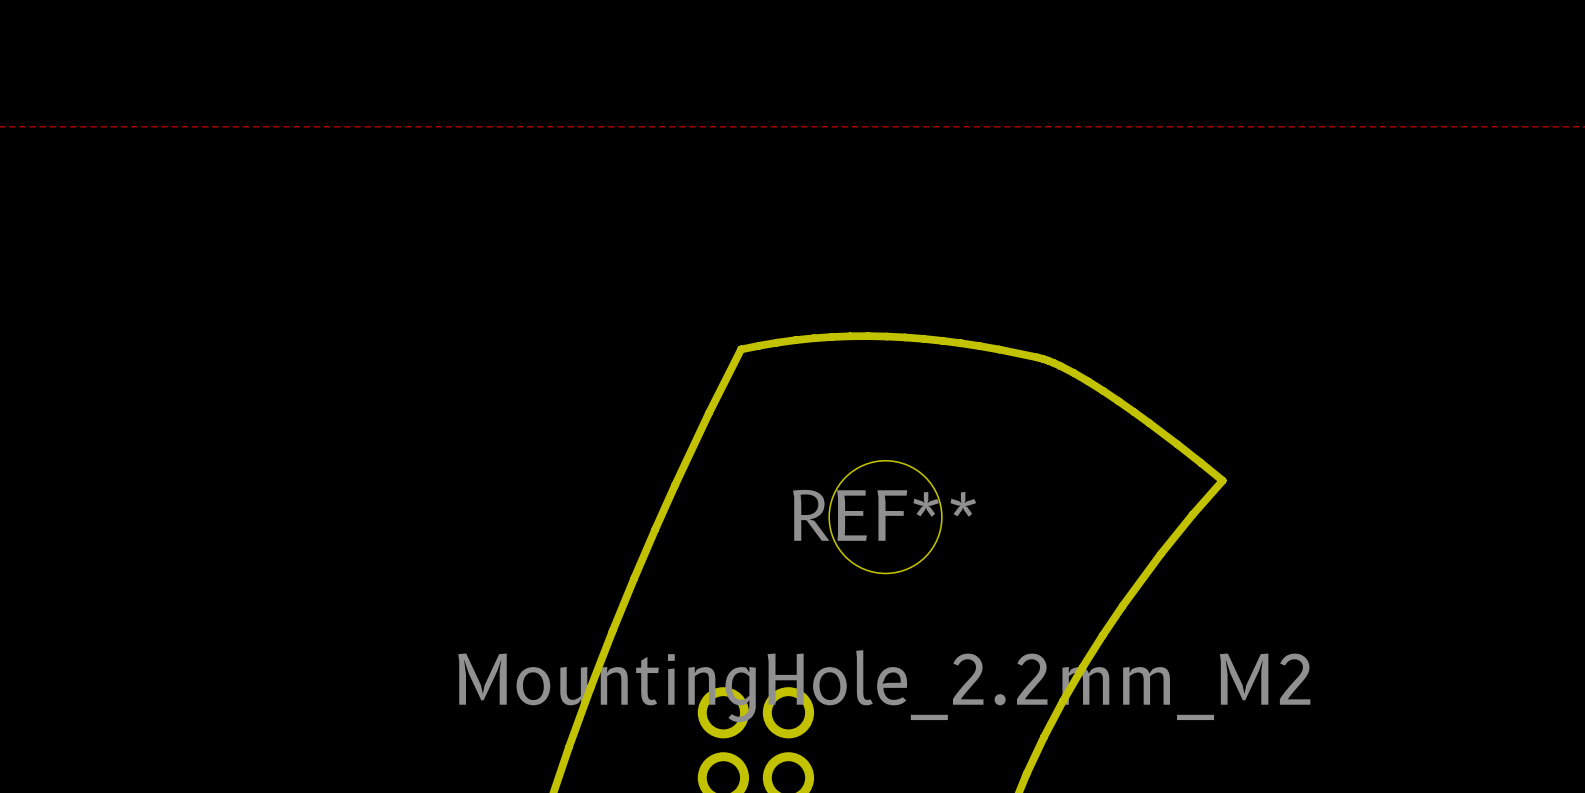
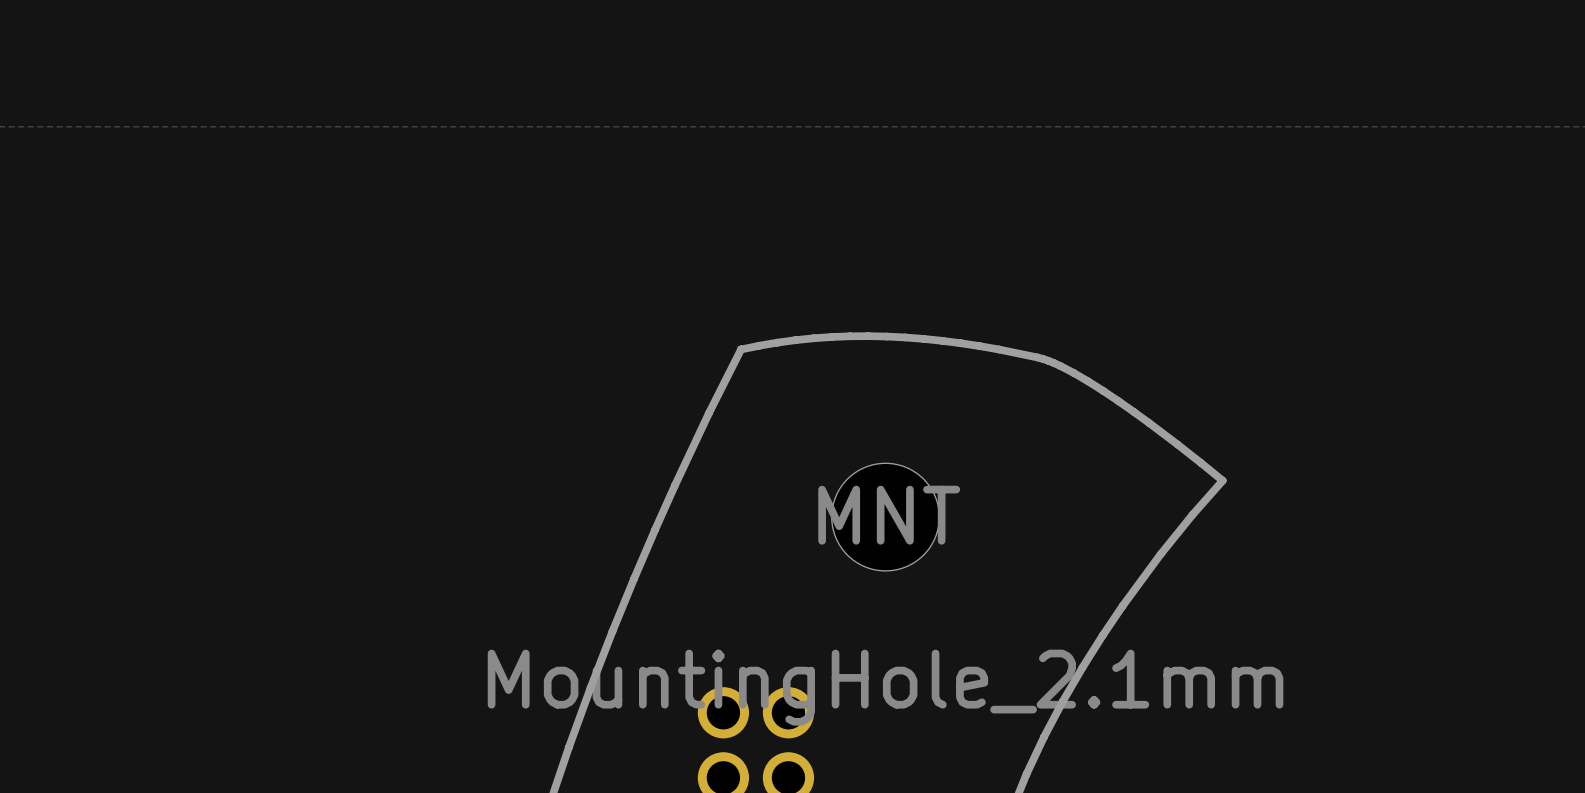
REF**: MountingHole_2.2mm_M2 (885, 517) -> none
MNT: none -> MountingHole_2.1mm (885, 517)

